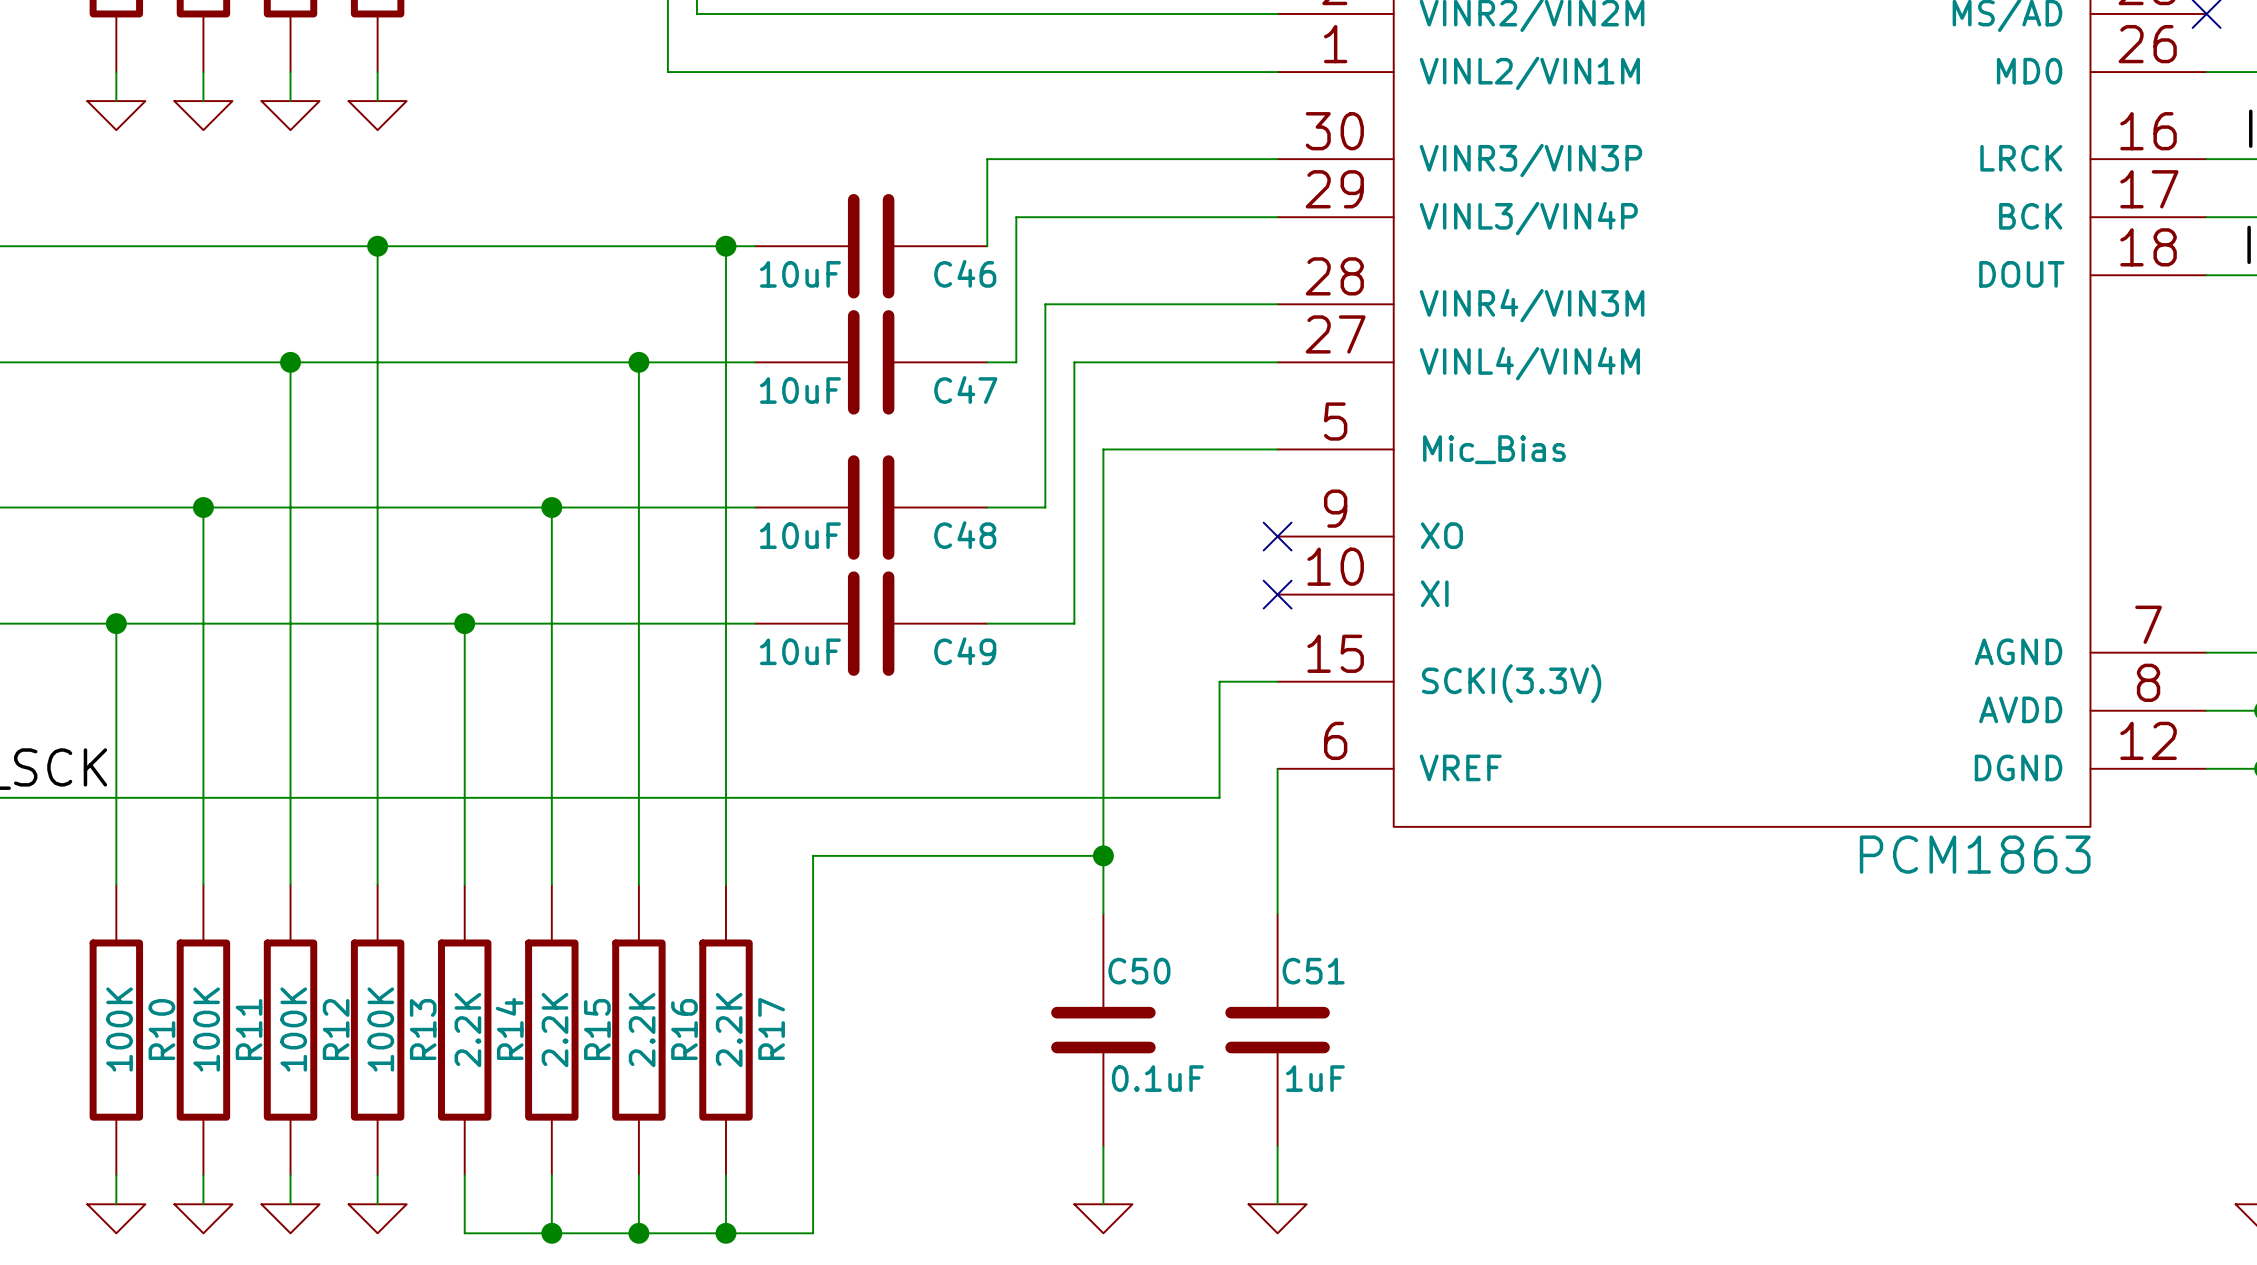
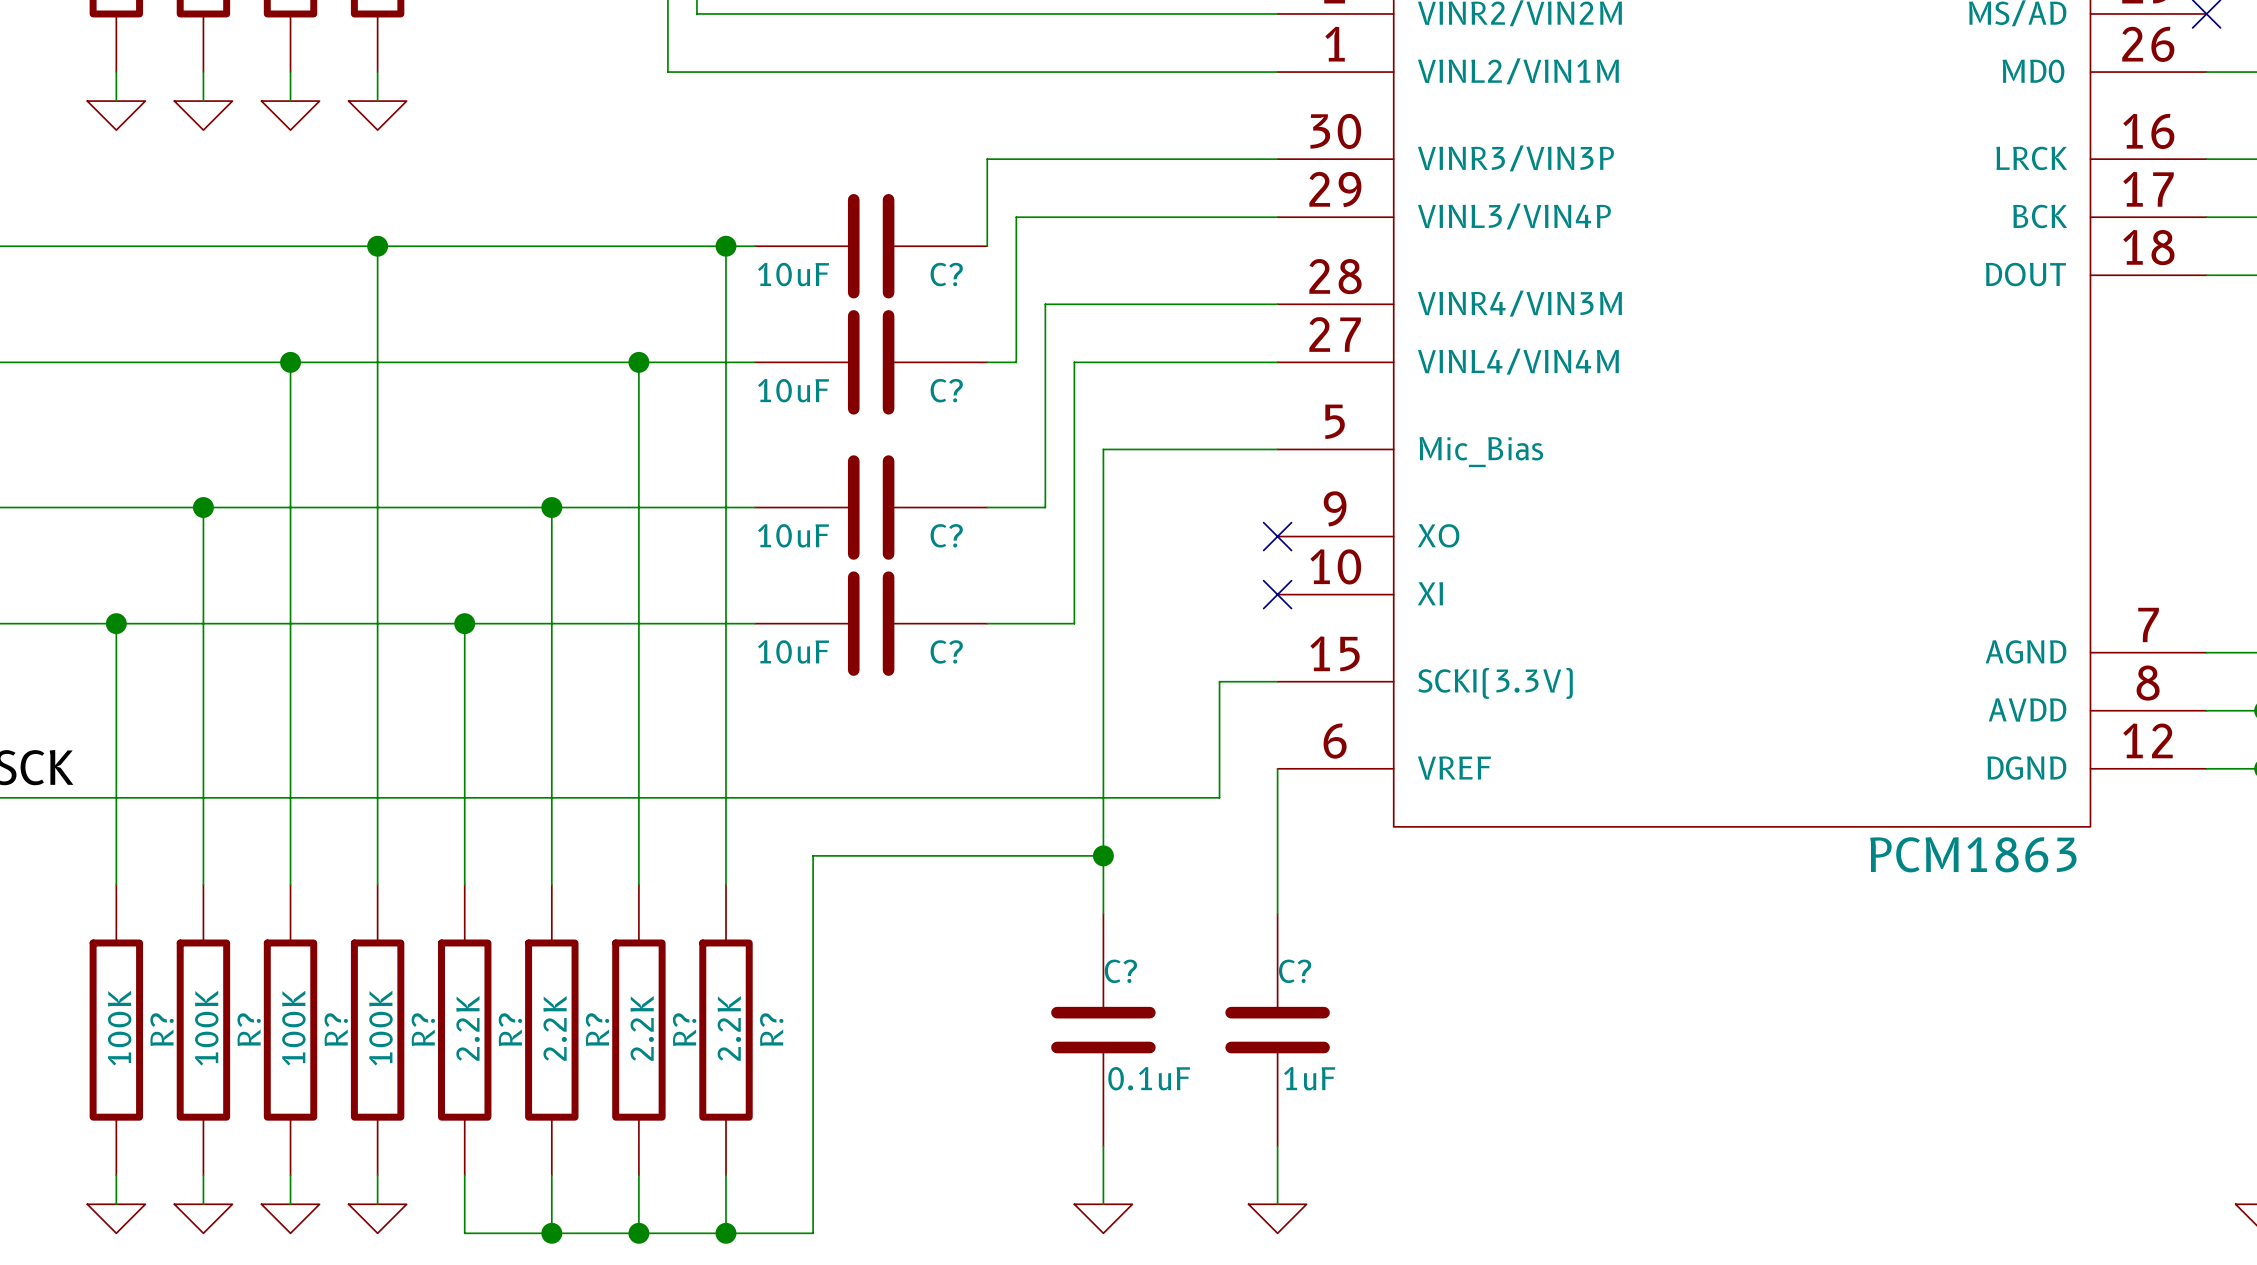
C46 name: C46 (965, 273) -> C? (946, 274)
C47 name: C47 (965, 389) -> C? (946, 390)
C48 name: C48 (965, 535) -> C? (946, 535)
C49 name: C49 (965, 651) -> C? (946, 651)
C50 name: C50 (1139, 971) -> C? (1120, 971)
C51 name: C51 (1313, 971) -> C? (1295, 971)
R14 name: R14 (509, 1028) -> R? (510, 1029)
R17 name: R17 (771, 1028) -> R? (771, 1029)
R10 name: R10 (161, 1029) -> R? (162, 1029)
R11 name: R11 (249, 1029) -> R? (249, 1029)
R12 name: R12 (336, 1029) -> R? (336, 1029)
R13 name: R13 (423, 1029) -> R? (423, 1029)
R15 name: R15 (597, 1029) -> R? (597, 1029)
R16 name: R16 (684, 1029) -> R? (684, 1029)

